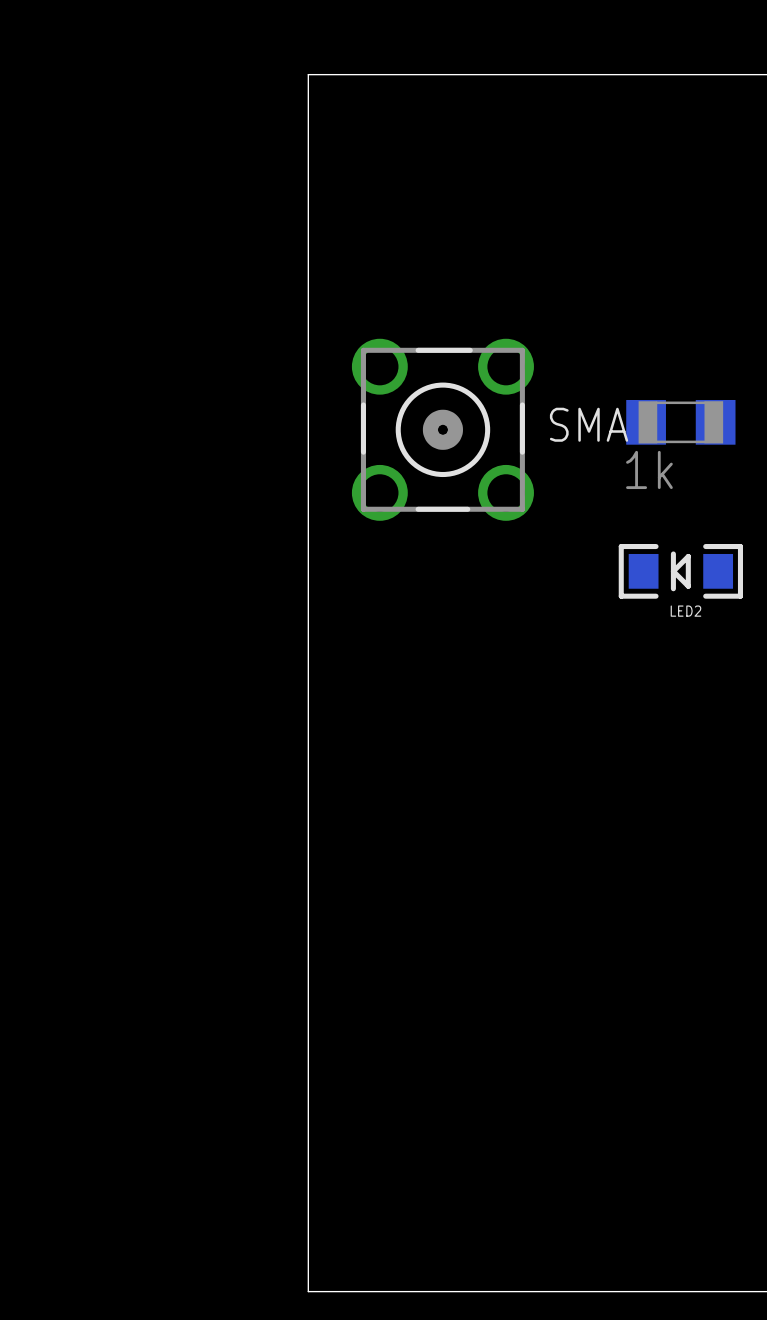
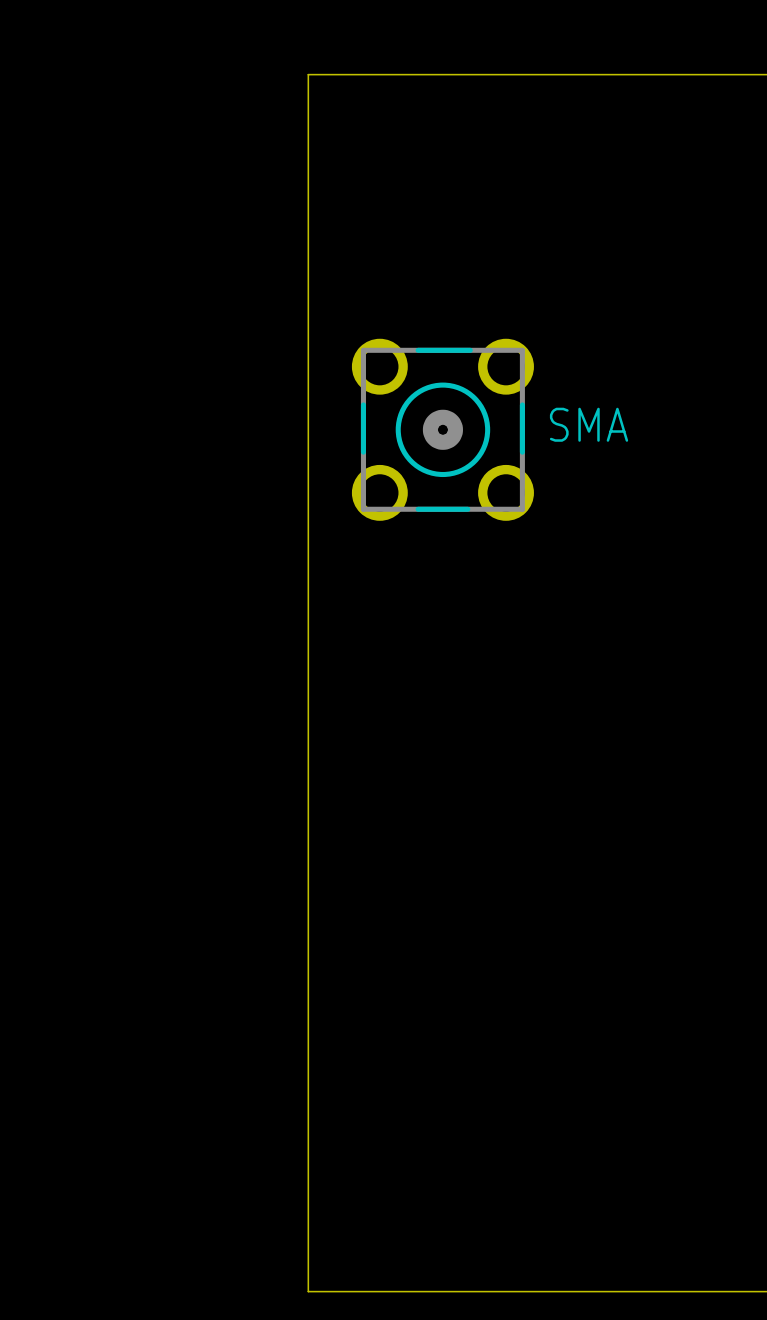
part: 1k (680, 422) -> none
LED2: (680, 571) -> none

